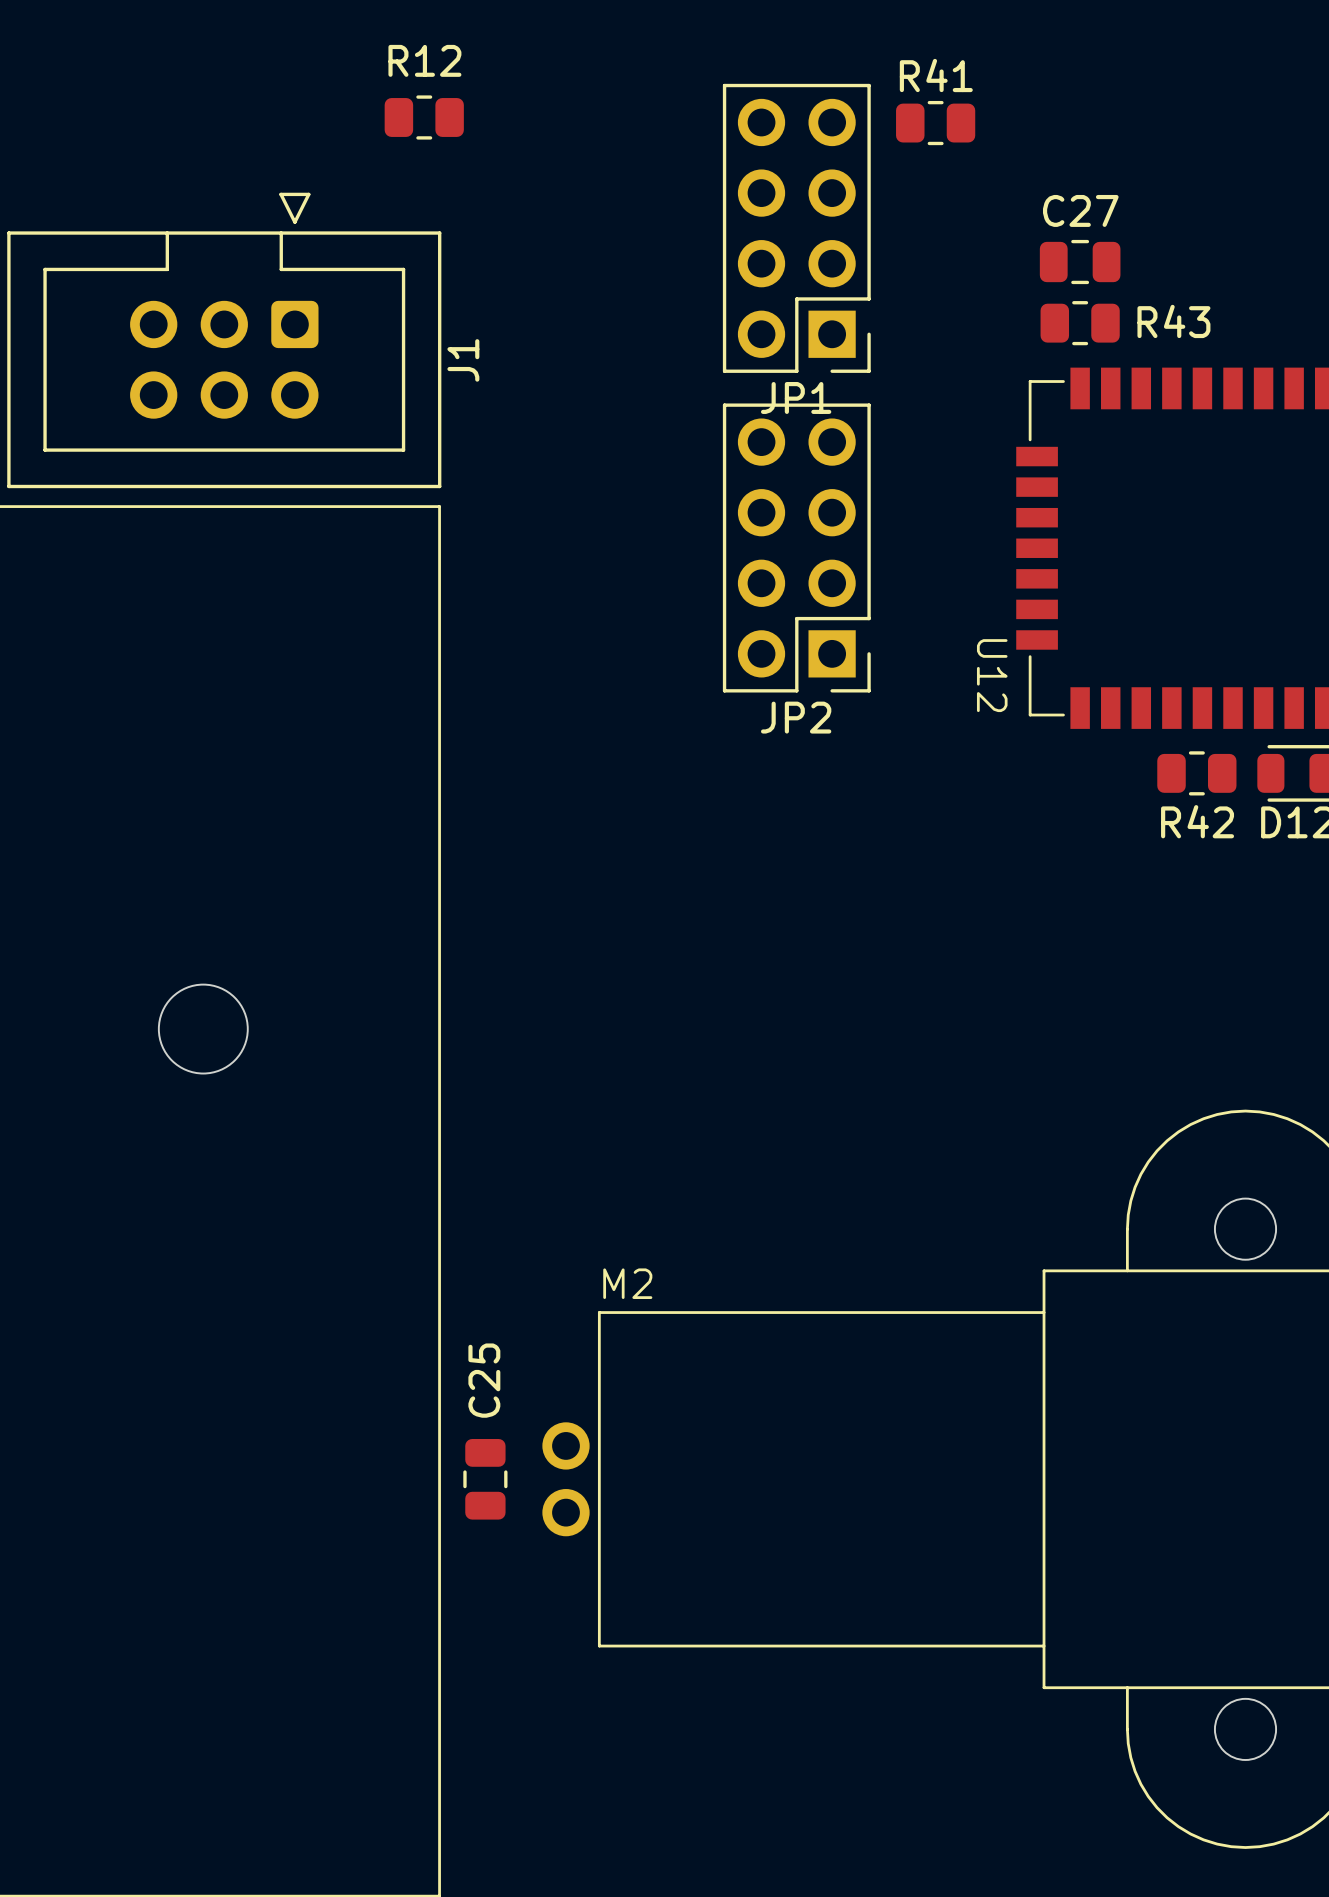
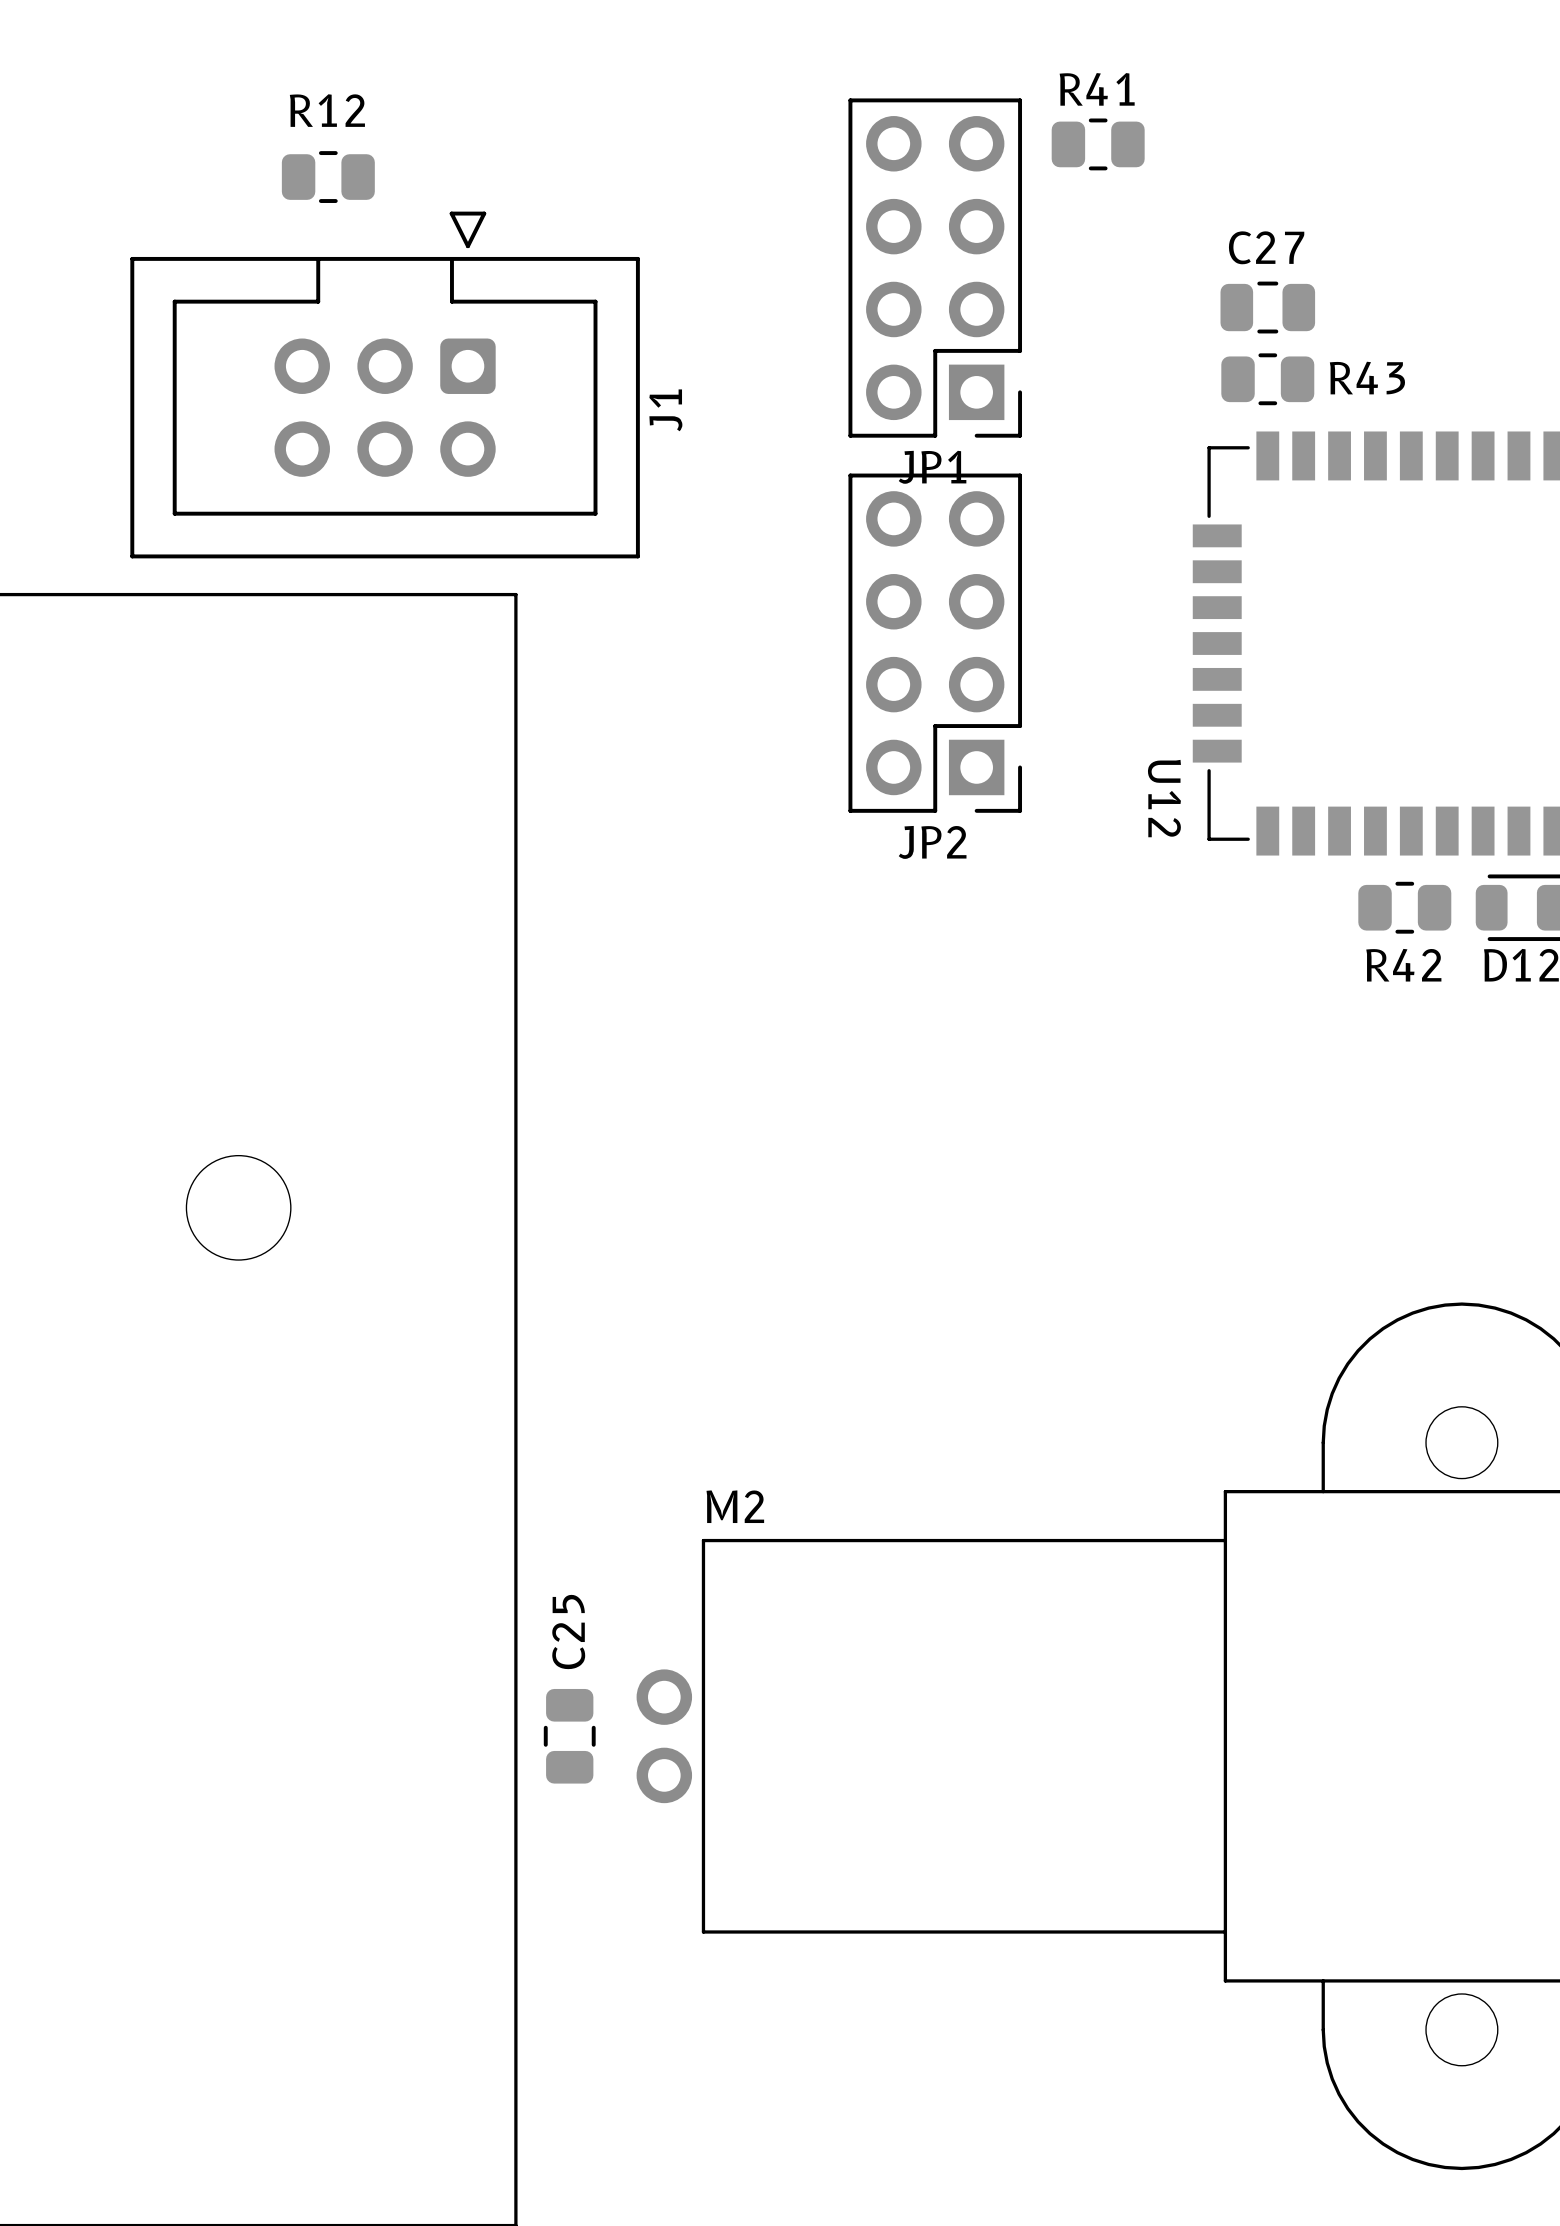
R12 position: (424, 117) -> (328, 177)
J1 position: (224, 340) -> (385, 385)

